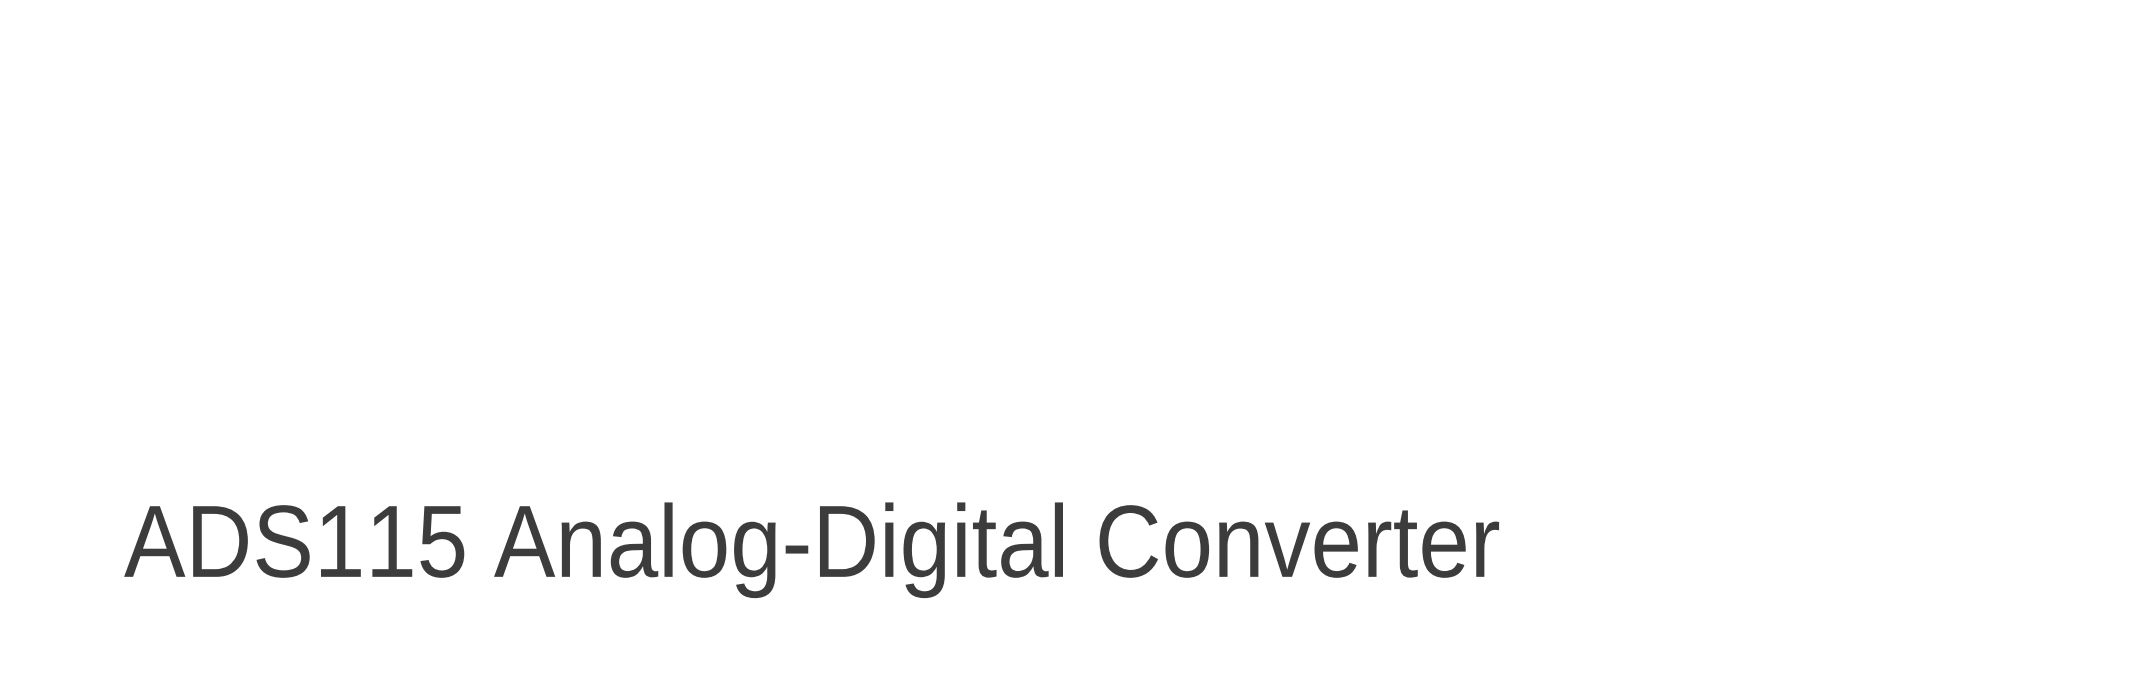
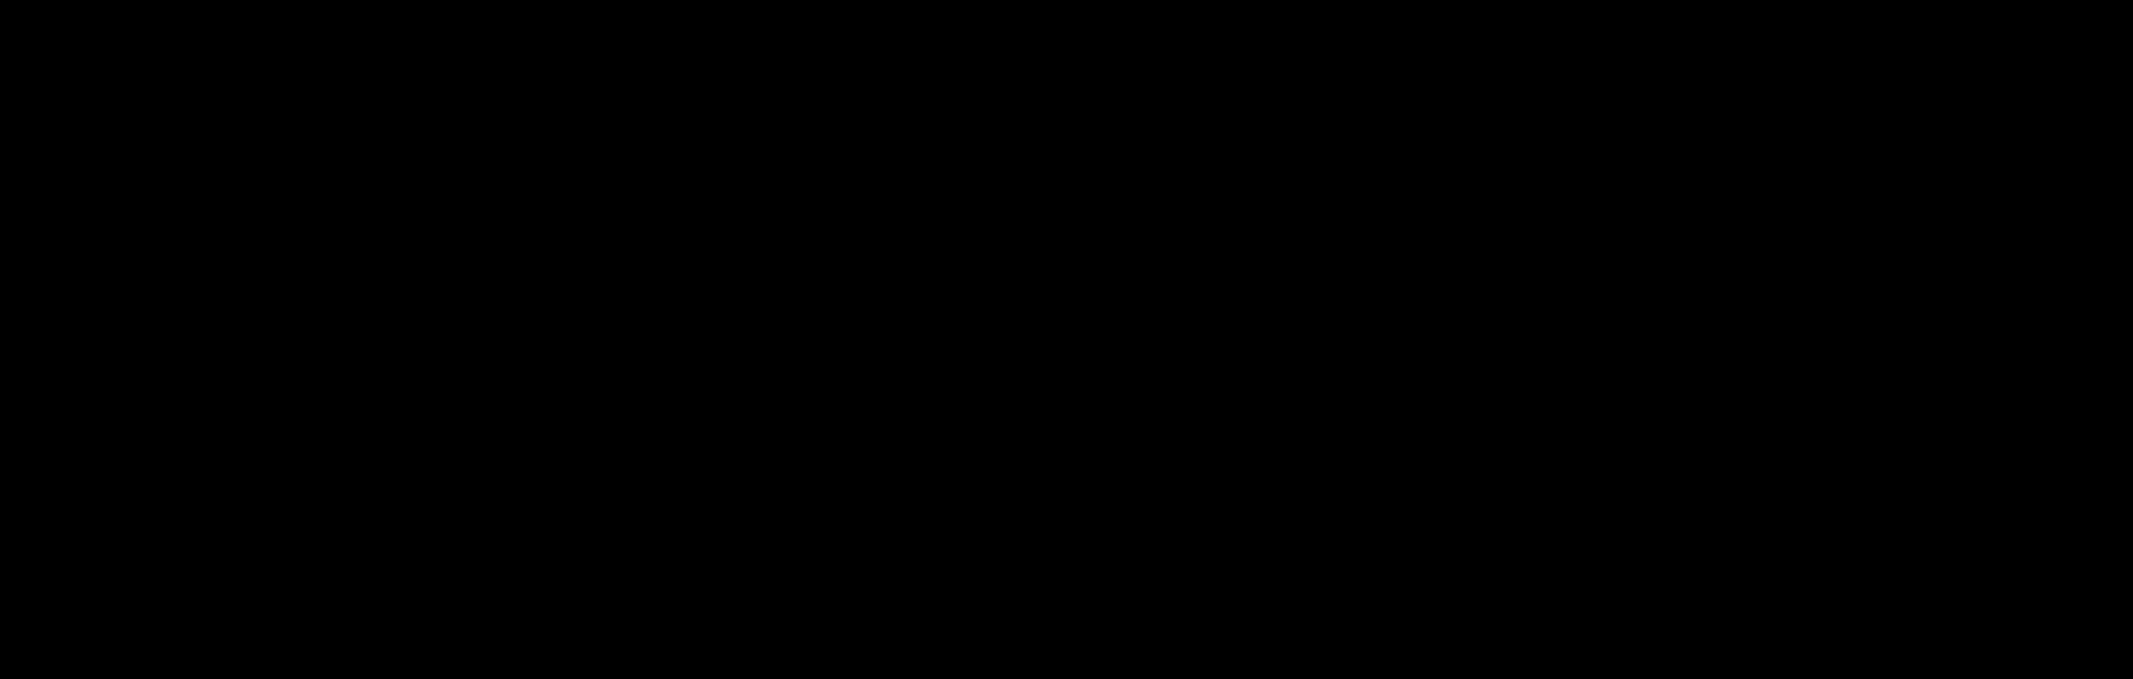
text: ADS115 Analog-Digital Converter (811, 550) -> none

